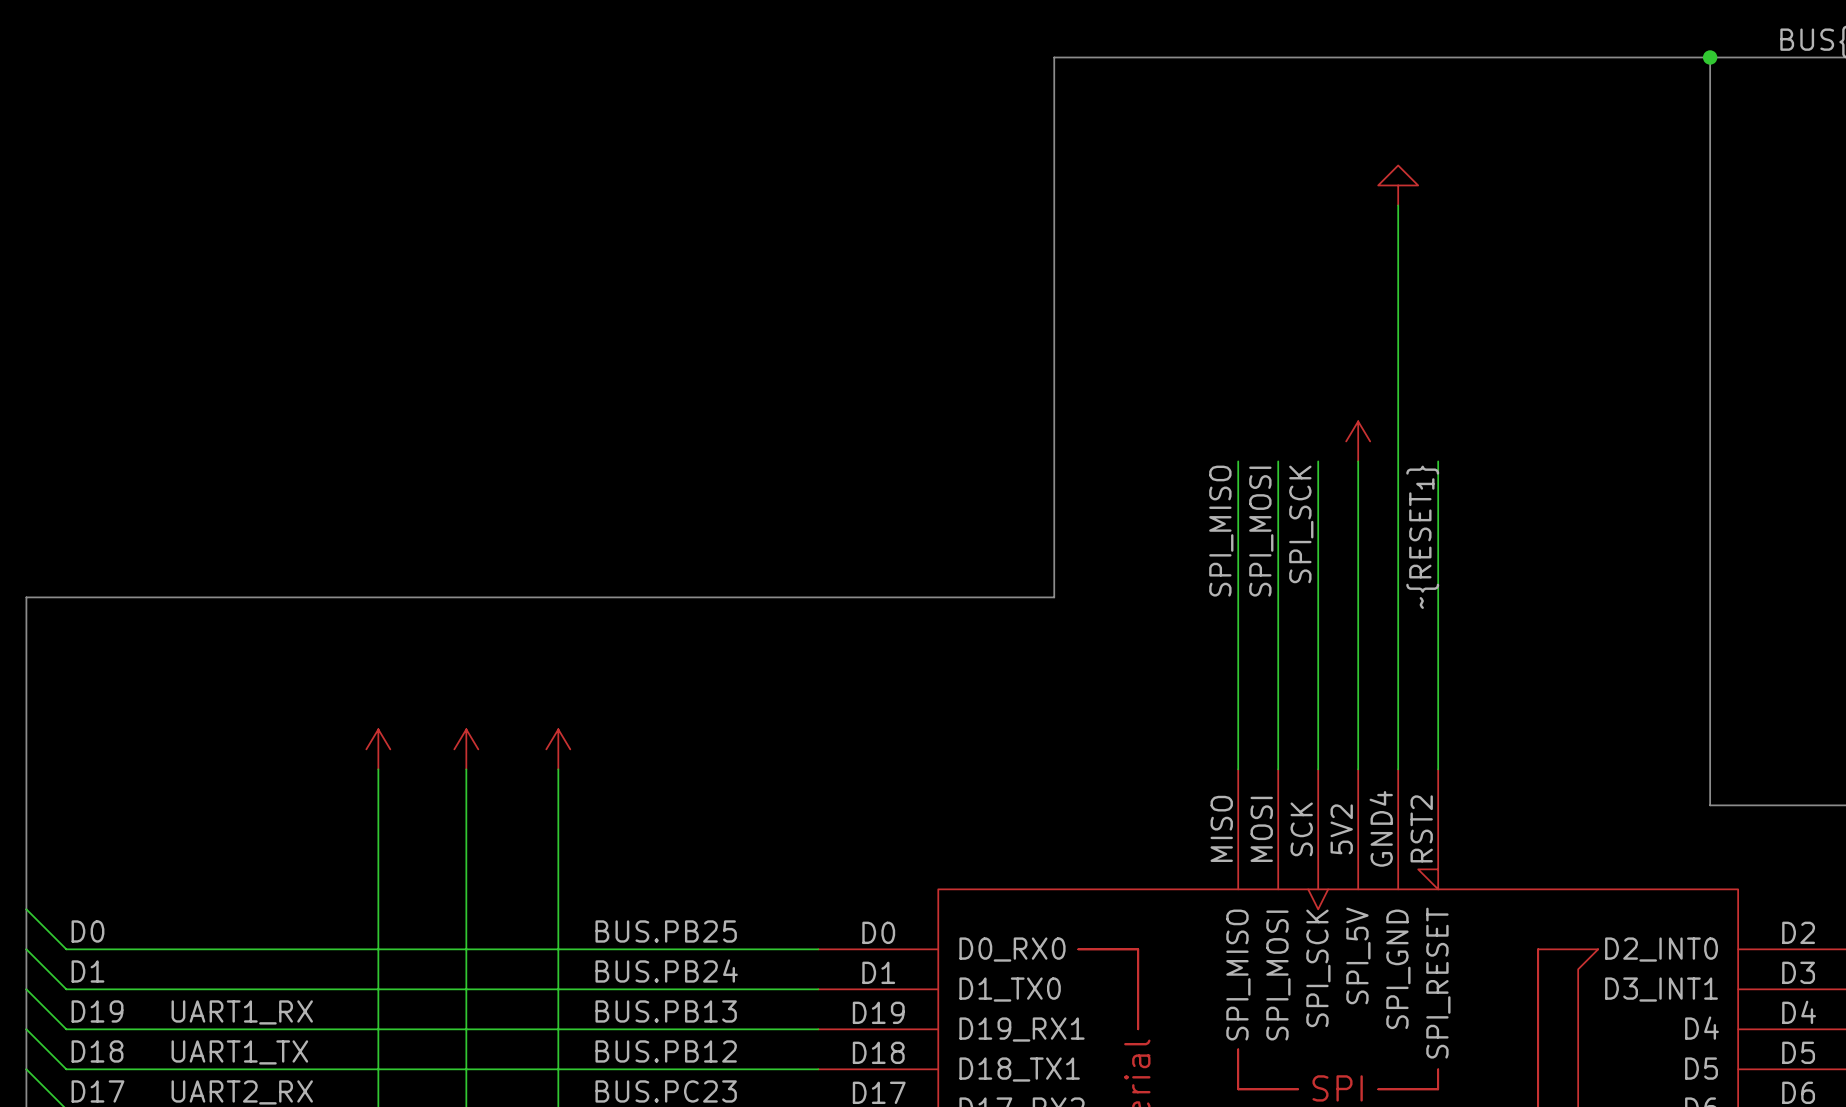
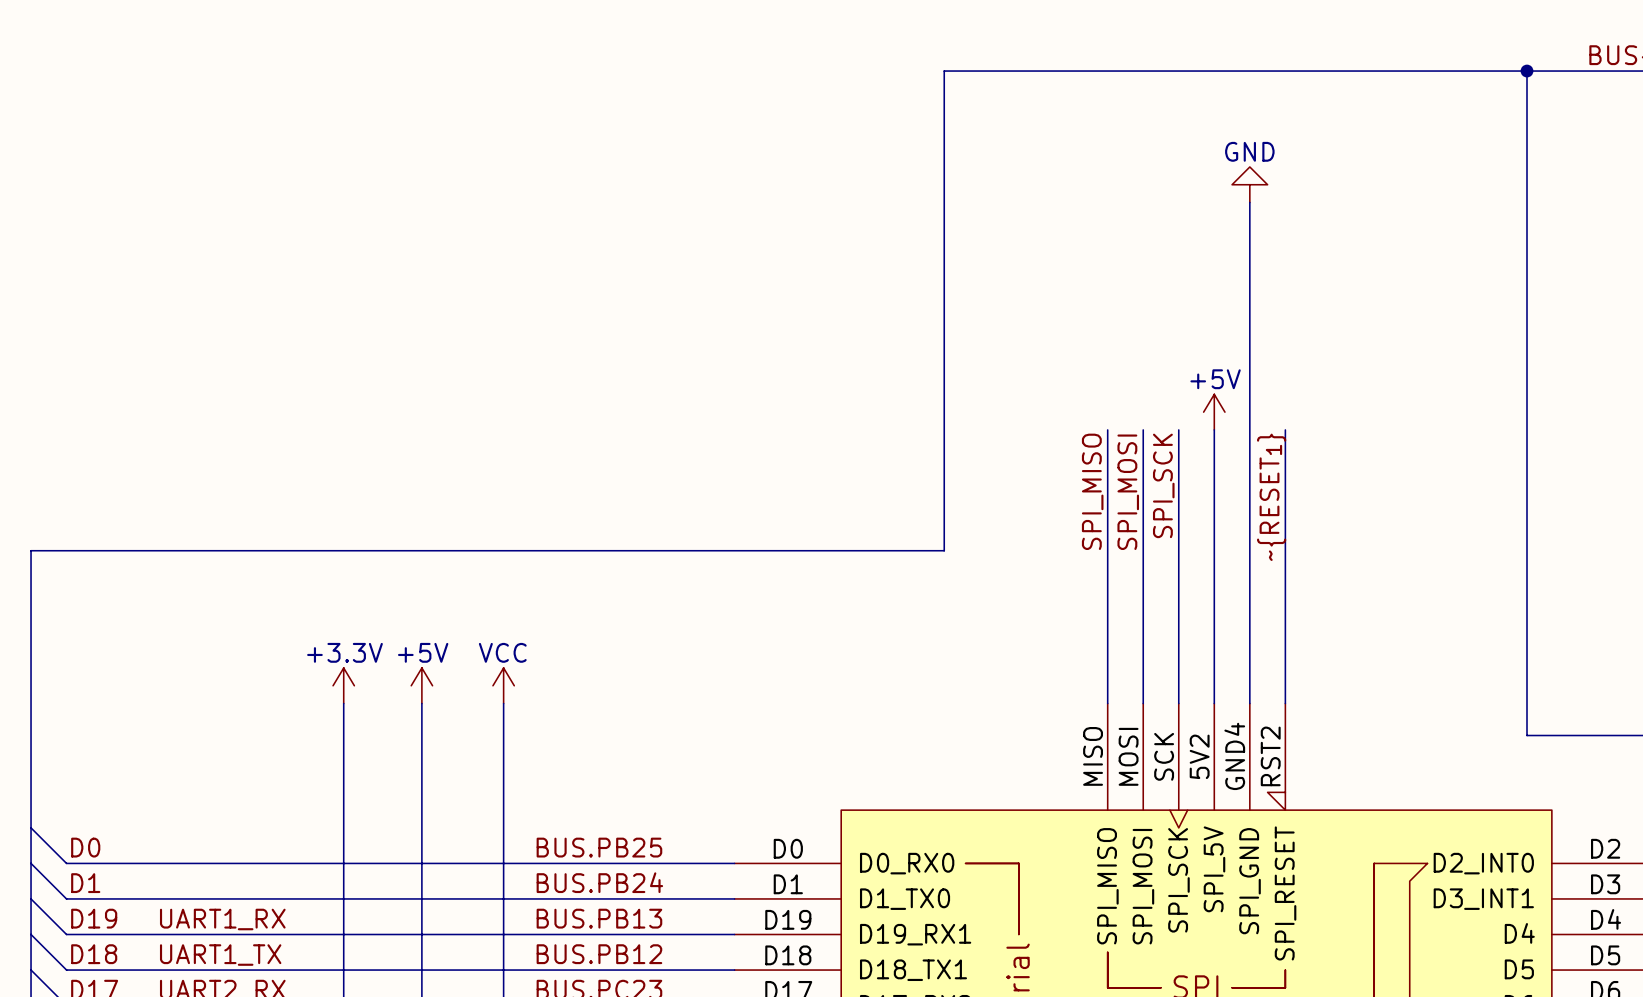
power symbol text: none -> GND (1249, 151)
power symbol text: none -> +5V (1215, 379)
power symbol text: none -> +3.3V (344, 652)
power symbol text: none -> +5V (423, 652)
power symbol text: none -> VCC (502, 652)

